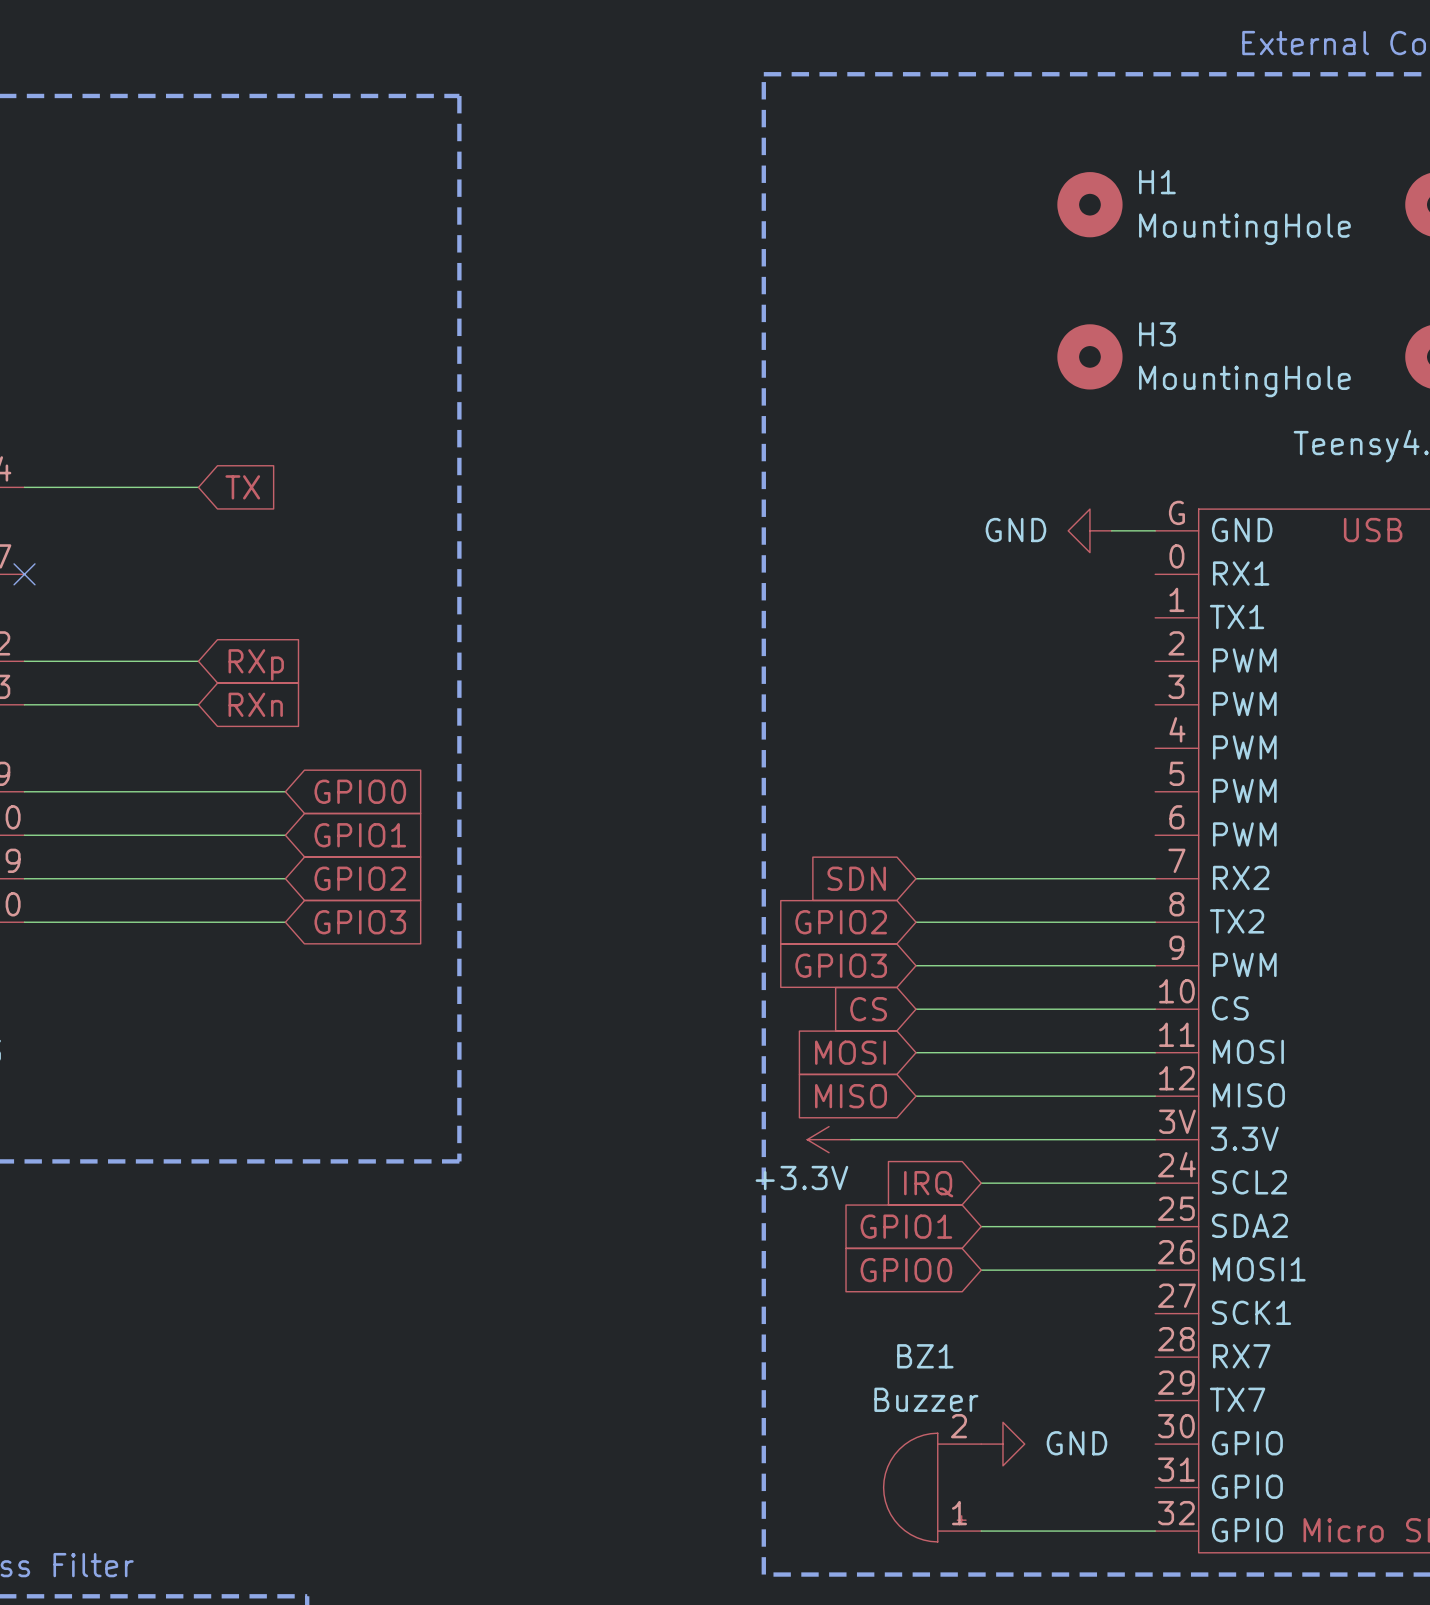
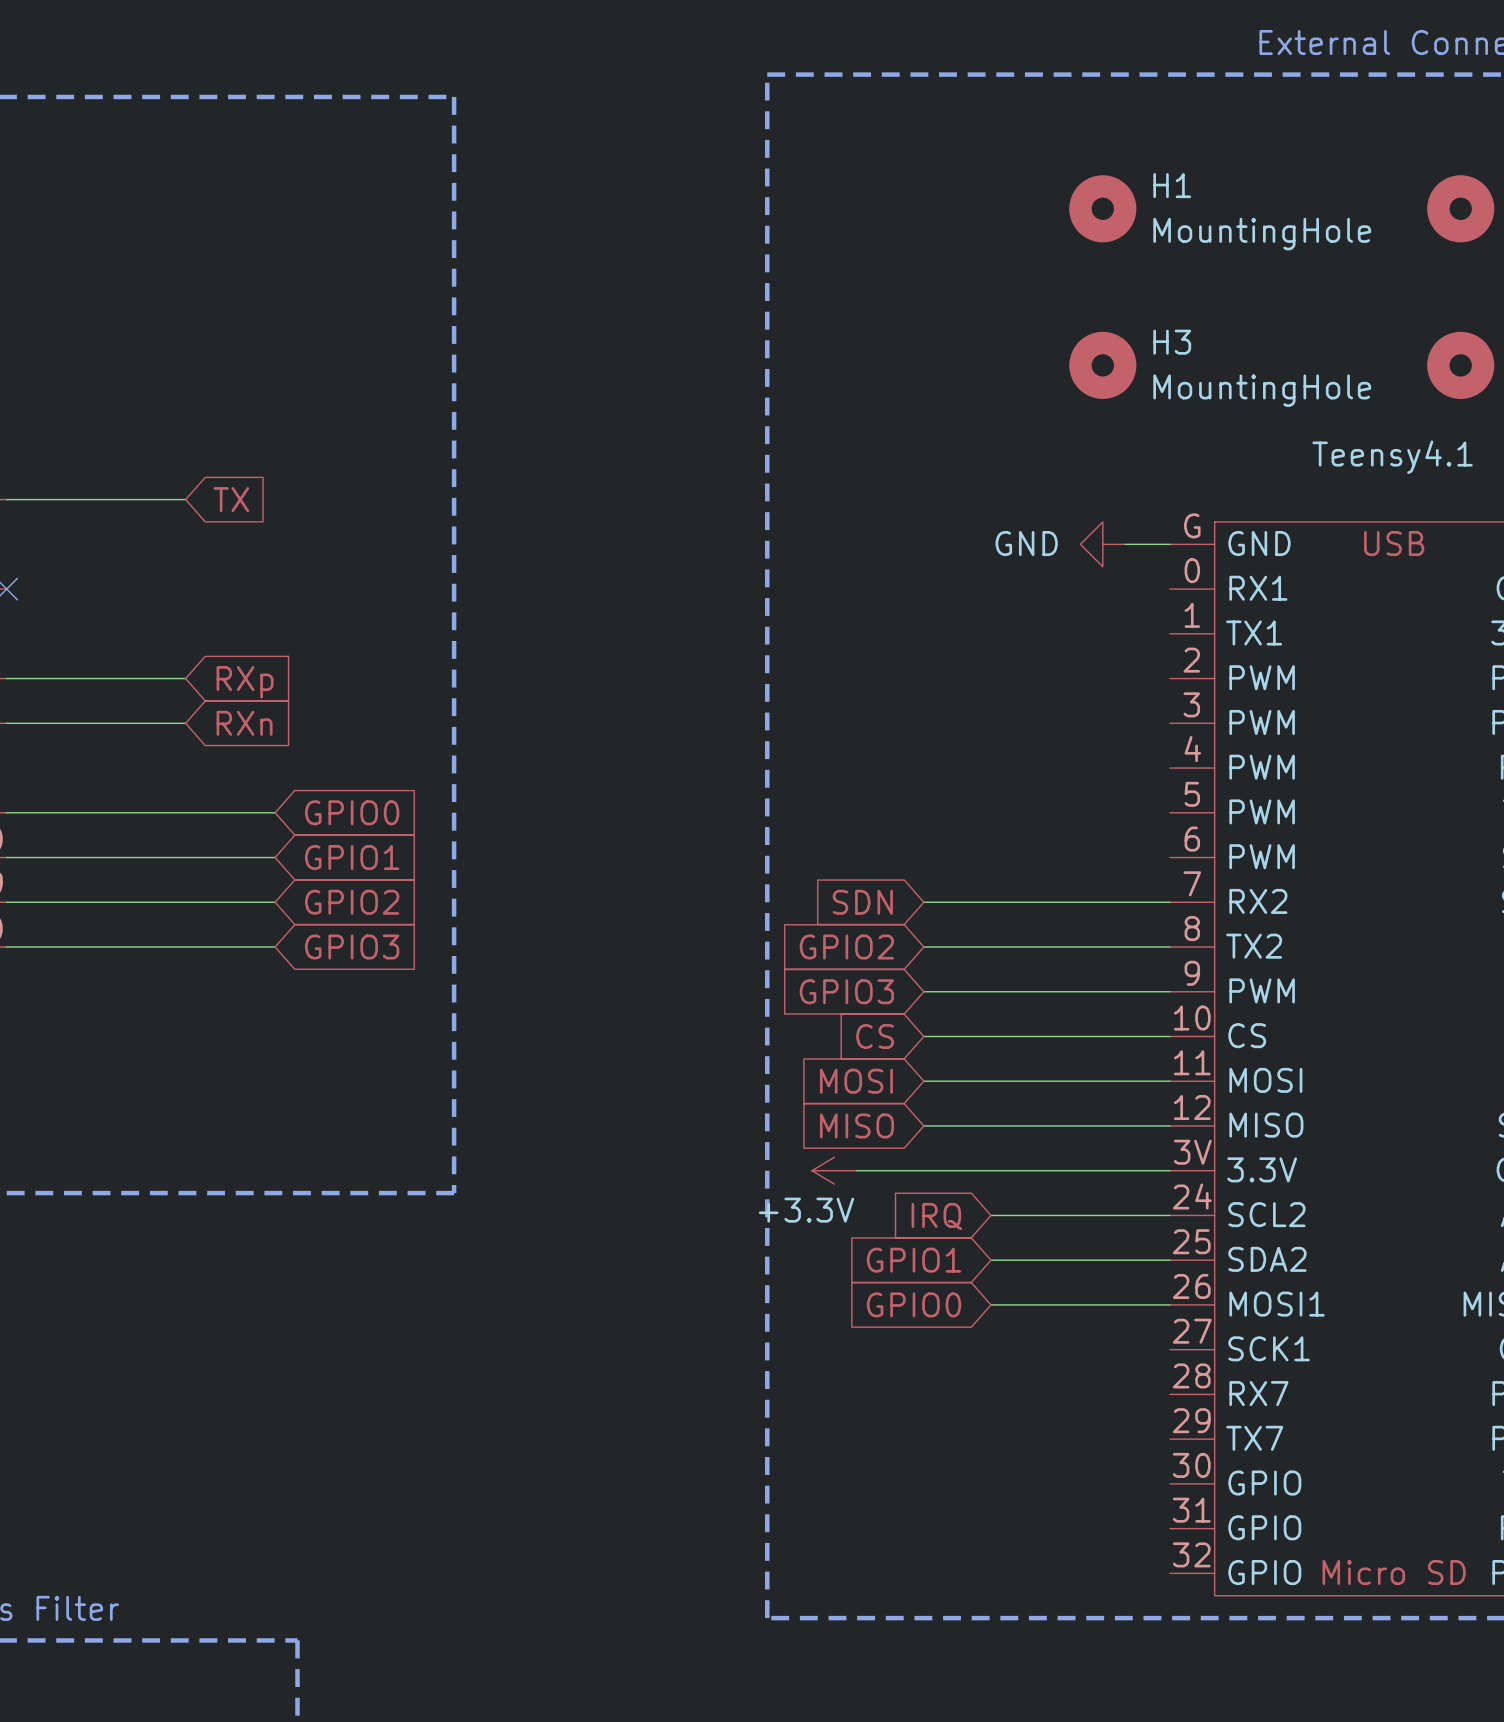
power symbol: GND (1002, 1444) -> none
BZ1: Buzzer (932, 1487) -> none
wire: (981, 1531) (1155, 1531) -> none

